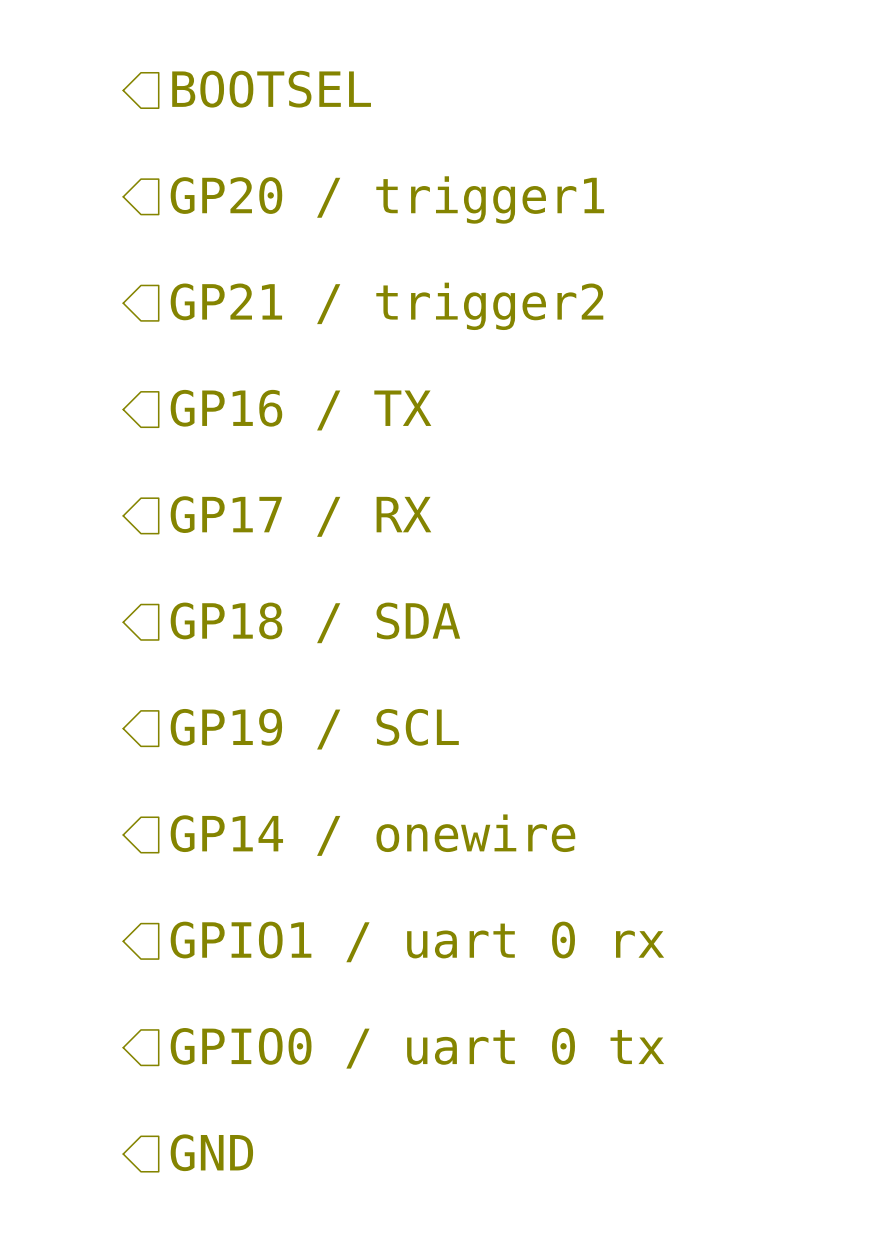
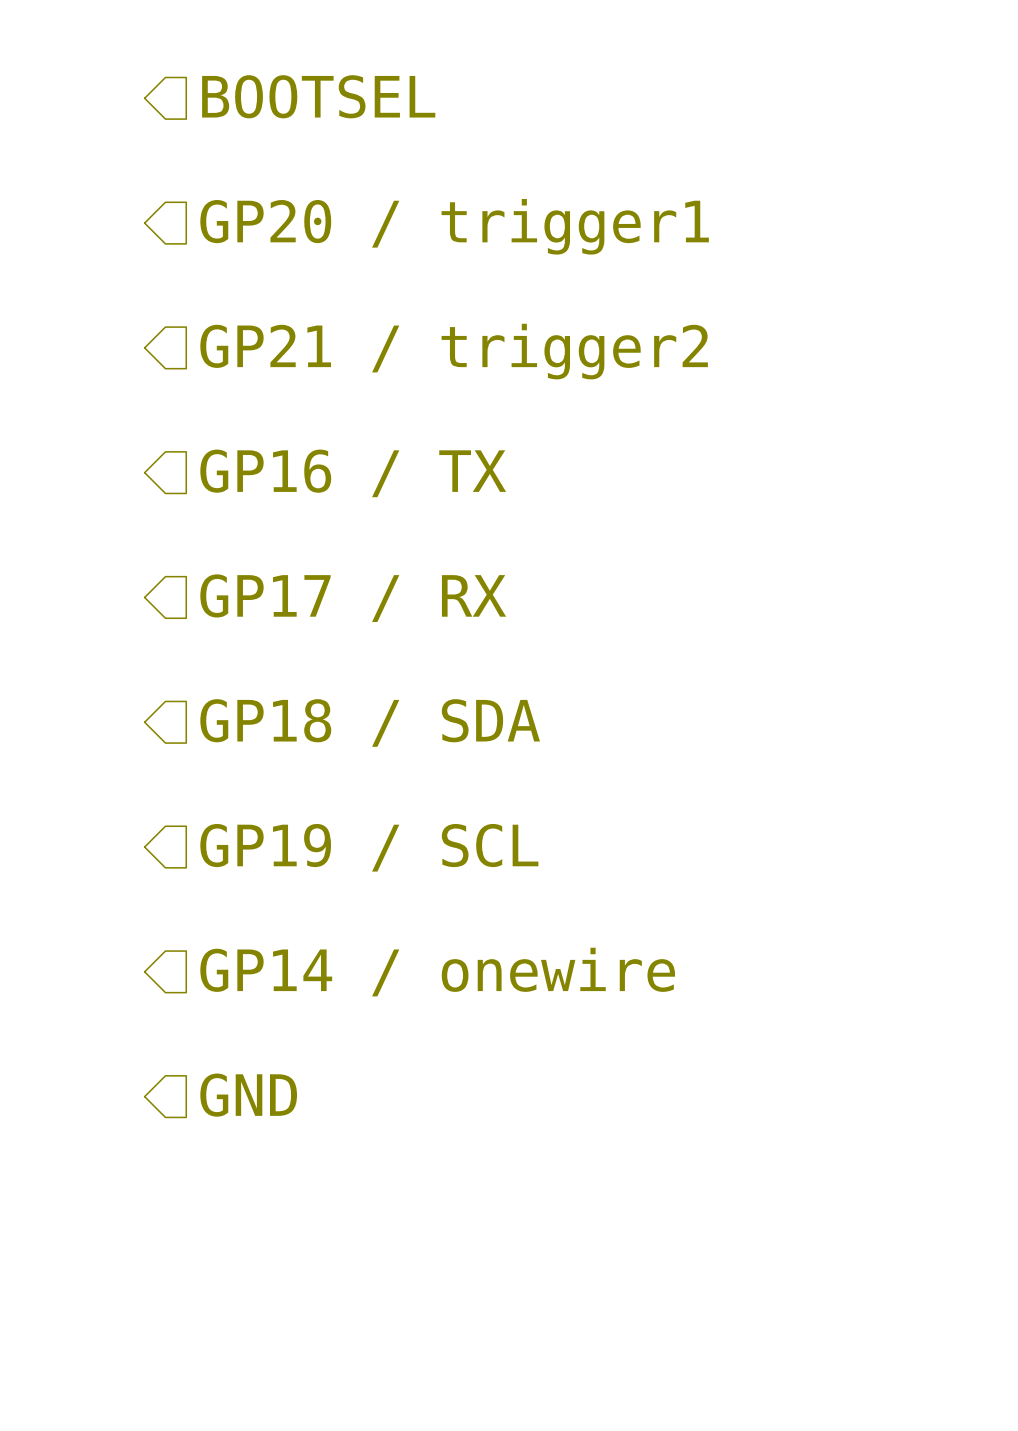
hierarchical label: GPIO1 / uart 0 rx (417, 941) -> GND (248, 1095)
hierarchical label: GPIO0 / uart 0 tx (417, 1048) -> none
hierarchical label: GND (211, 1152) -> none

